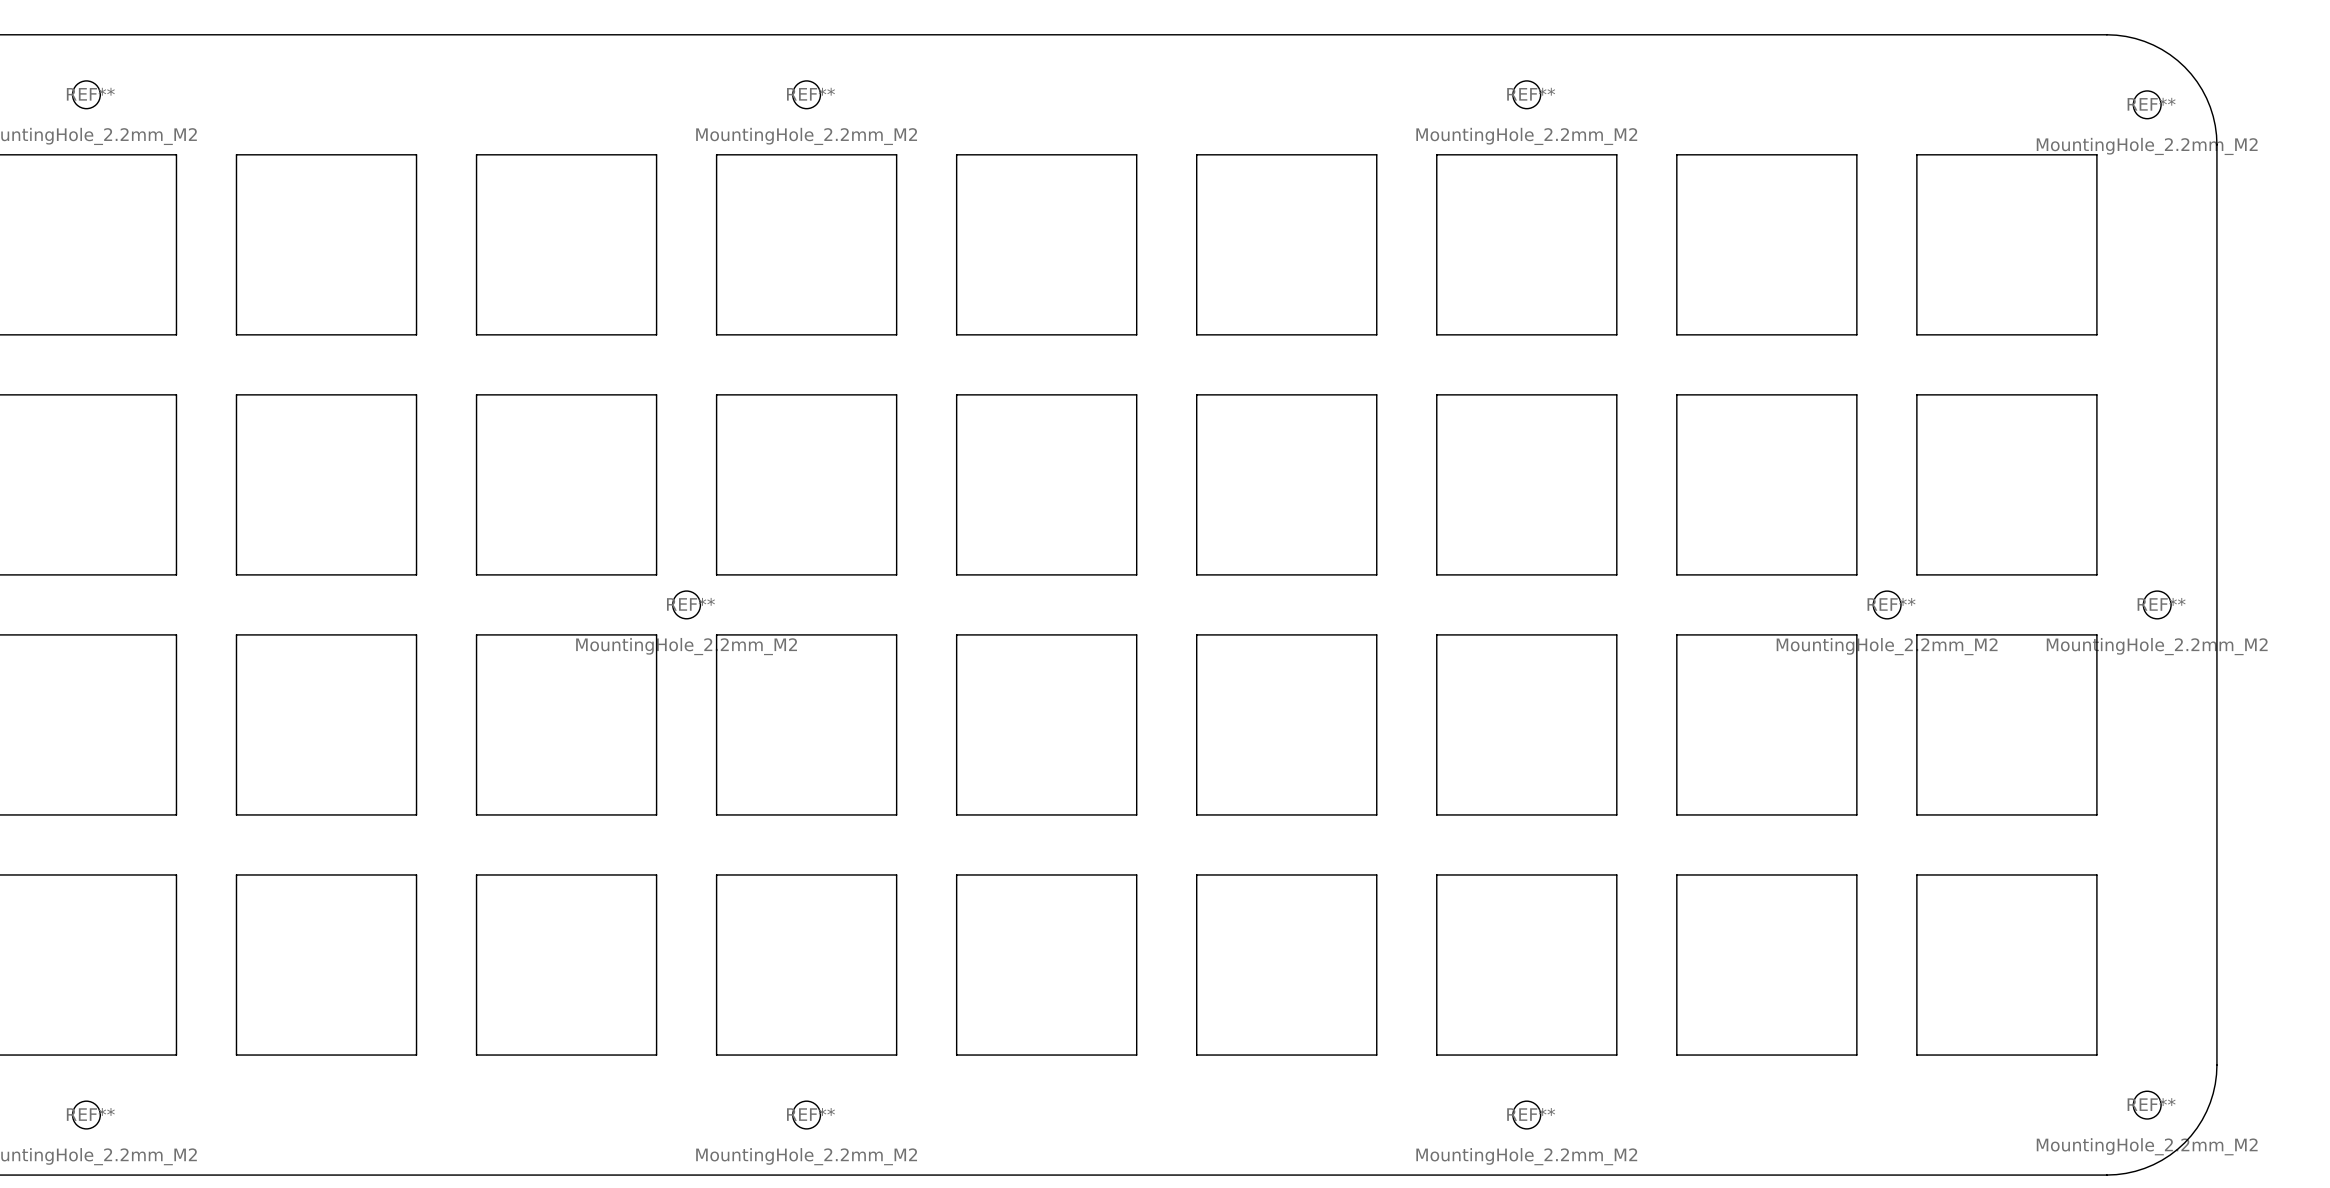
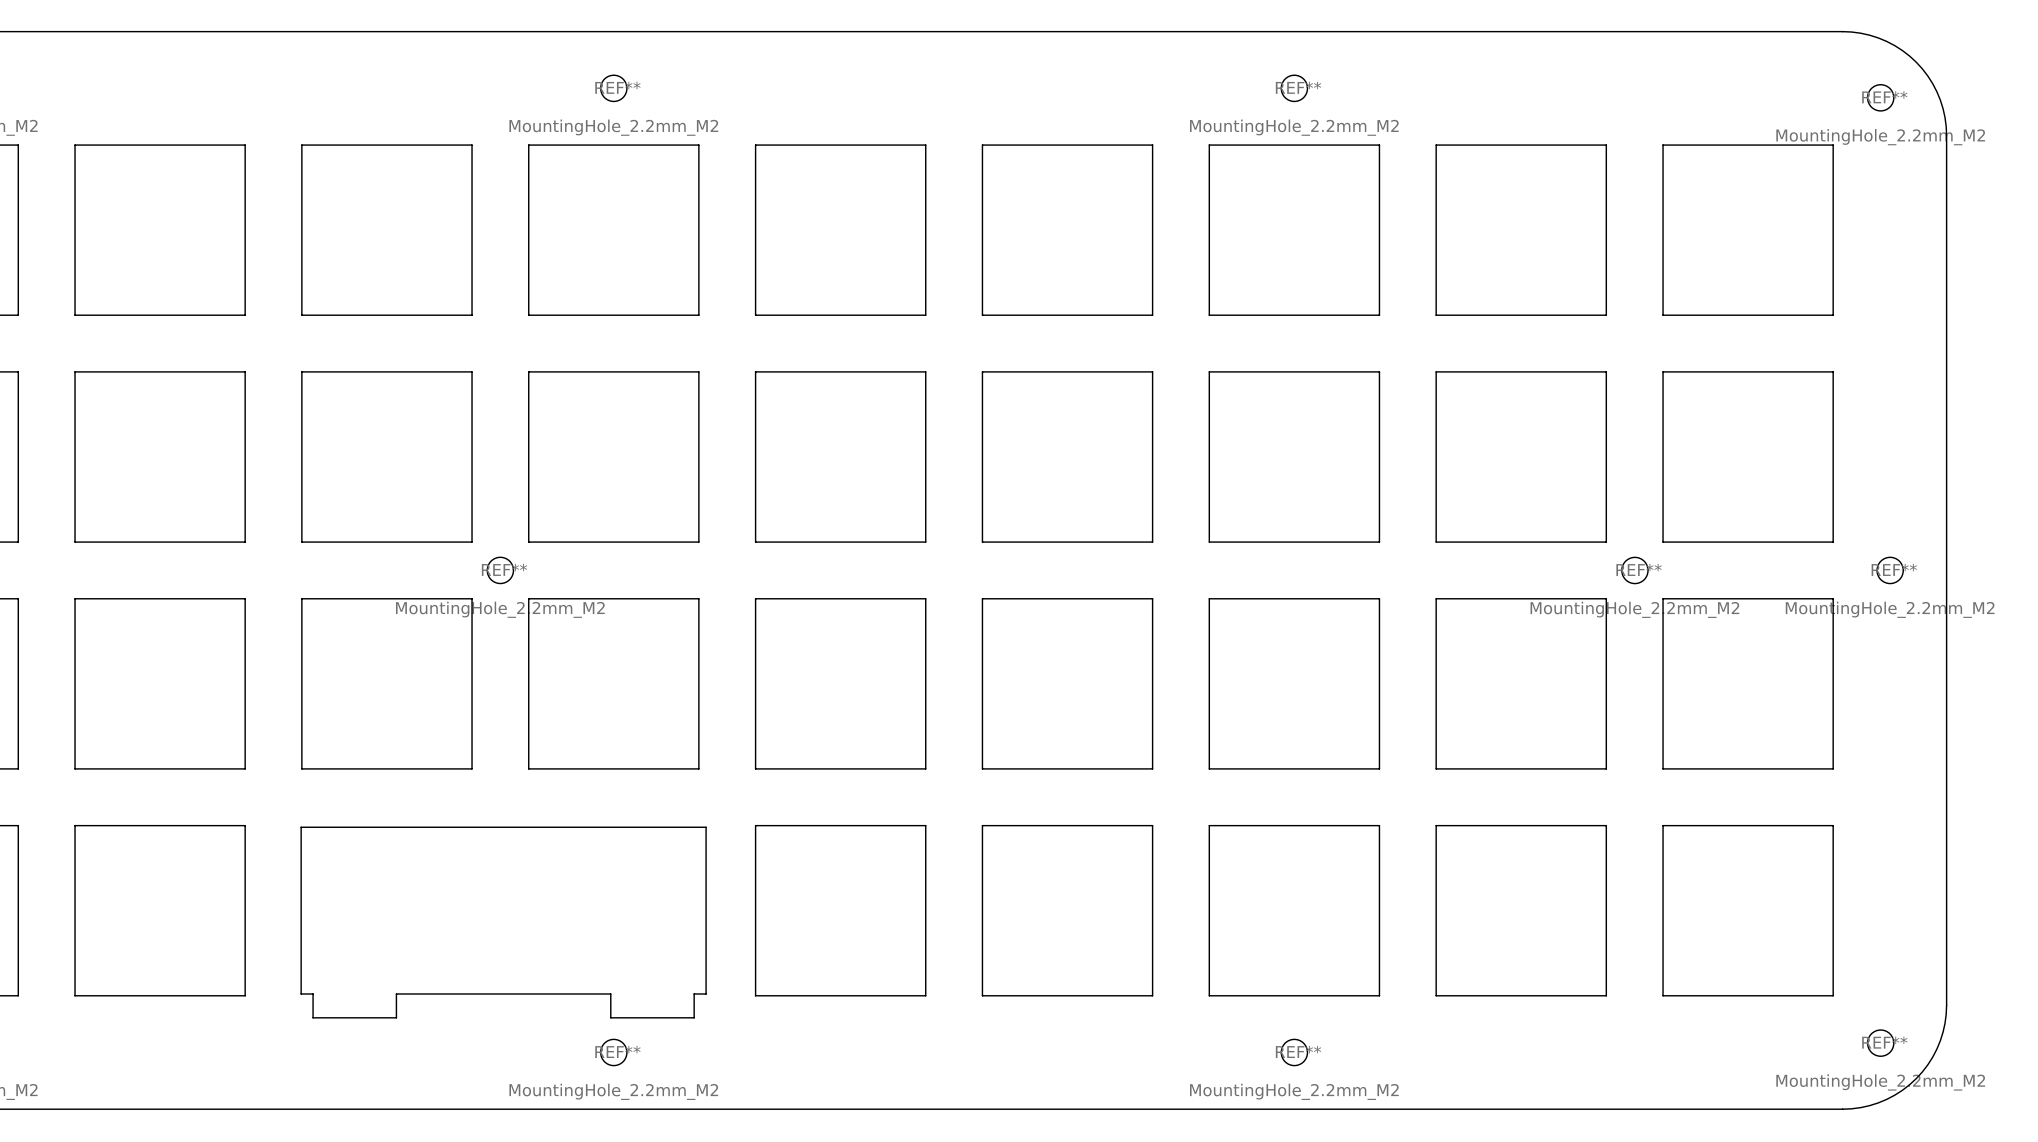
board edge: (476, 874) (656, 874) (656, 1055) (476, 1055) (476, 874) -> none
board edge: (716, 874) (716, 1055) (896, 1055) (896, 874) (716, 874) -> none
board edge: none -> (301, 827) (301, 994) (313, 994) (313, 1017) (396, 1017) (396, 994) (610, 994) (610, 1017) (694, 1017) (694, 994) (706, 994) (706, 827) (301, 827)

